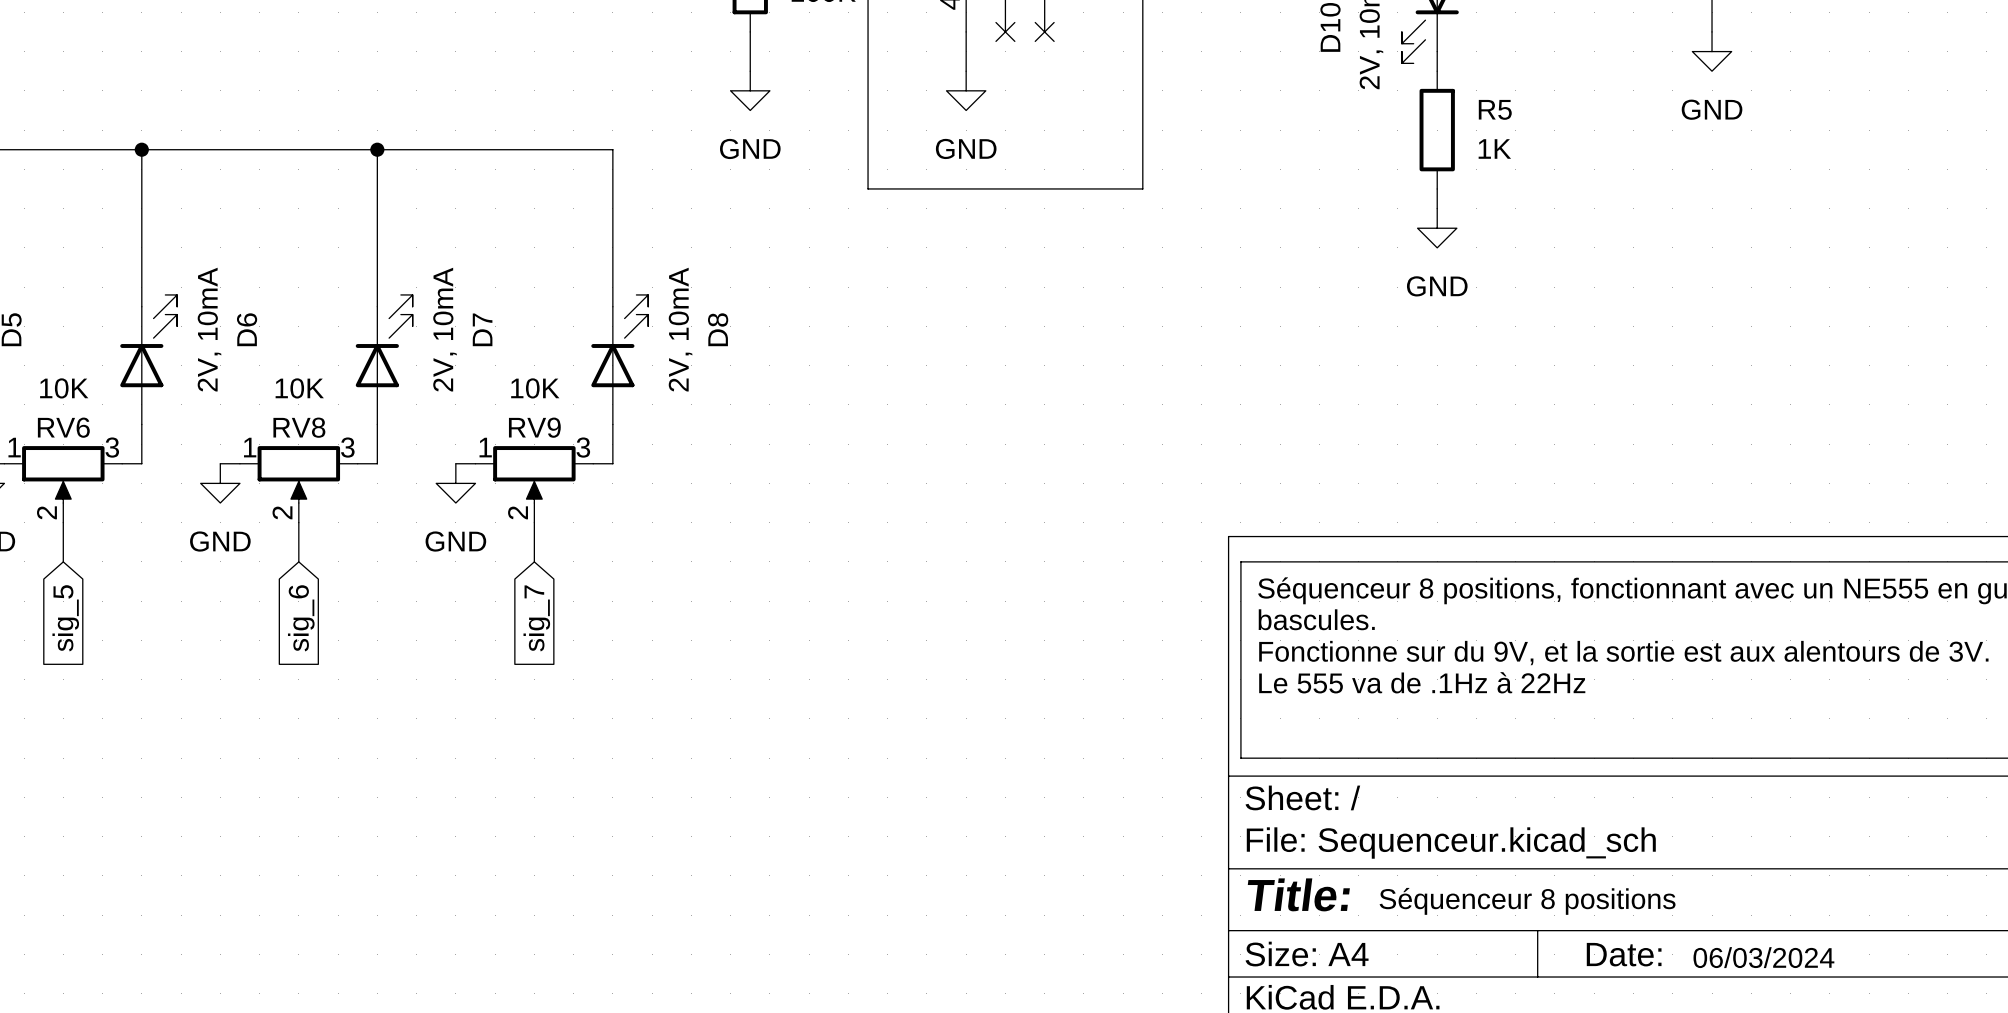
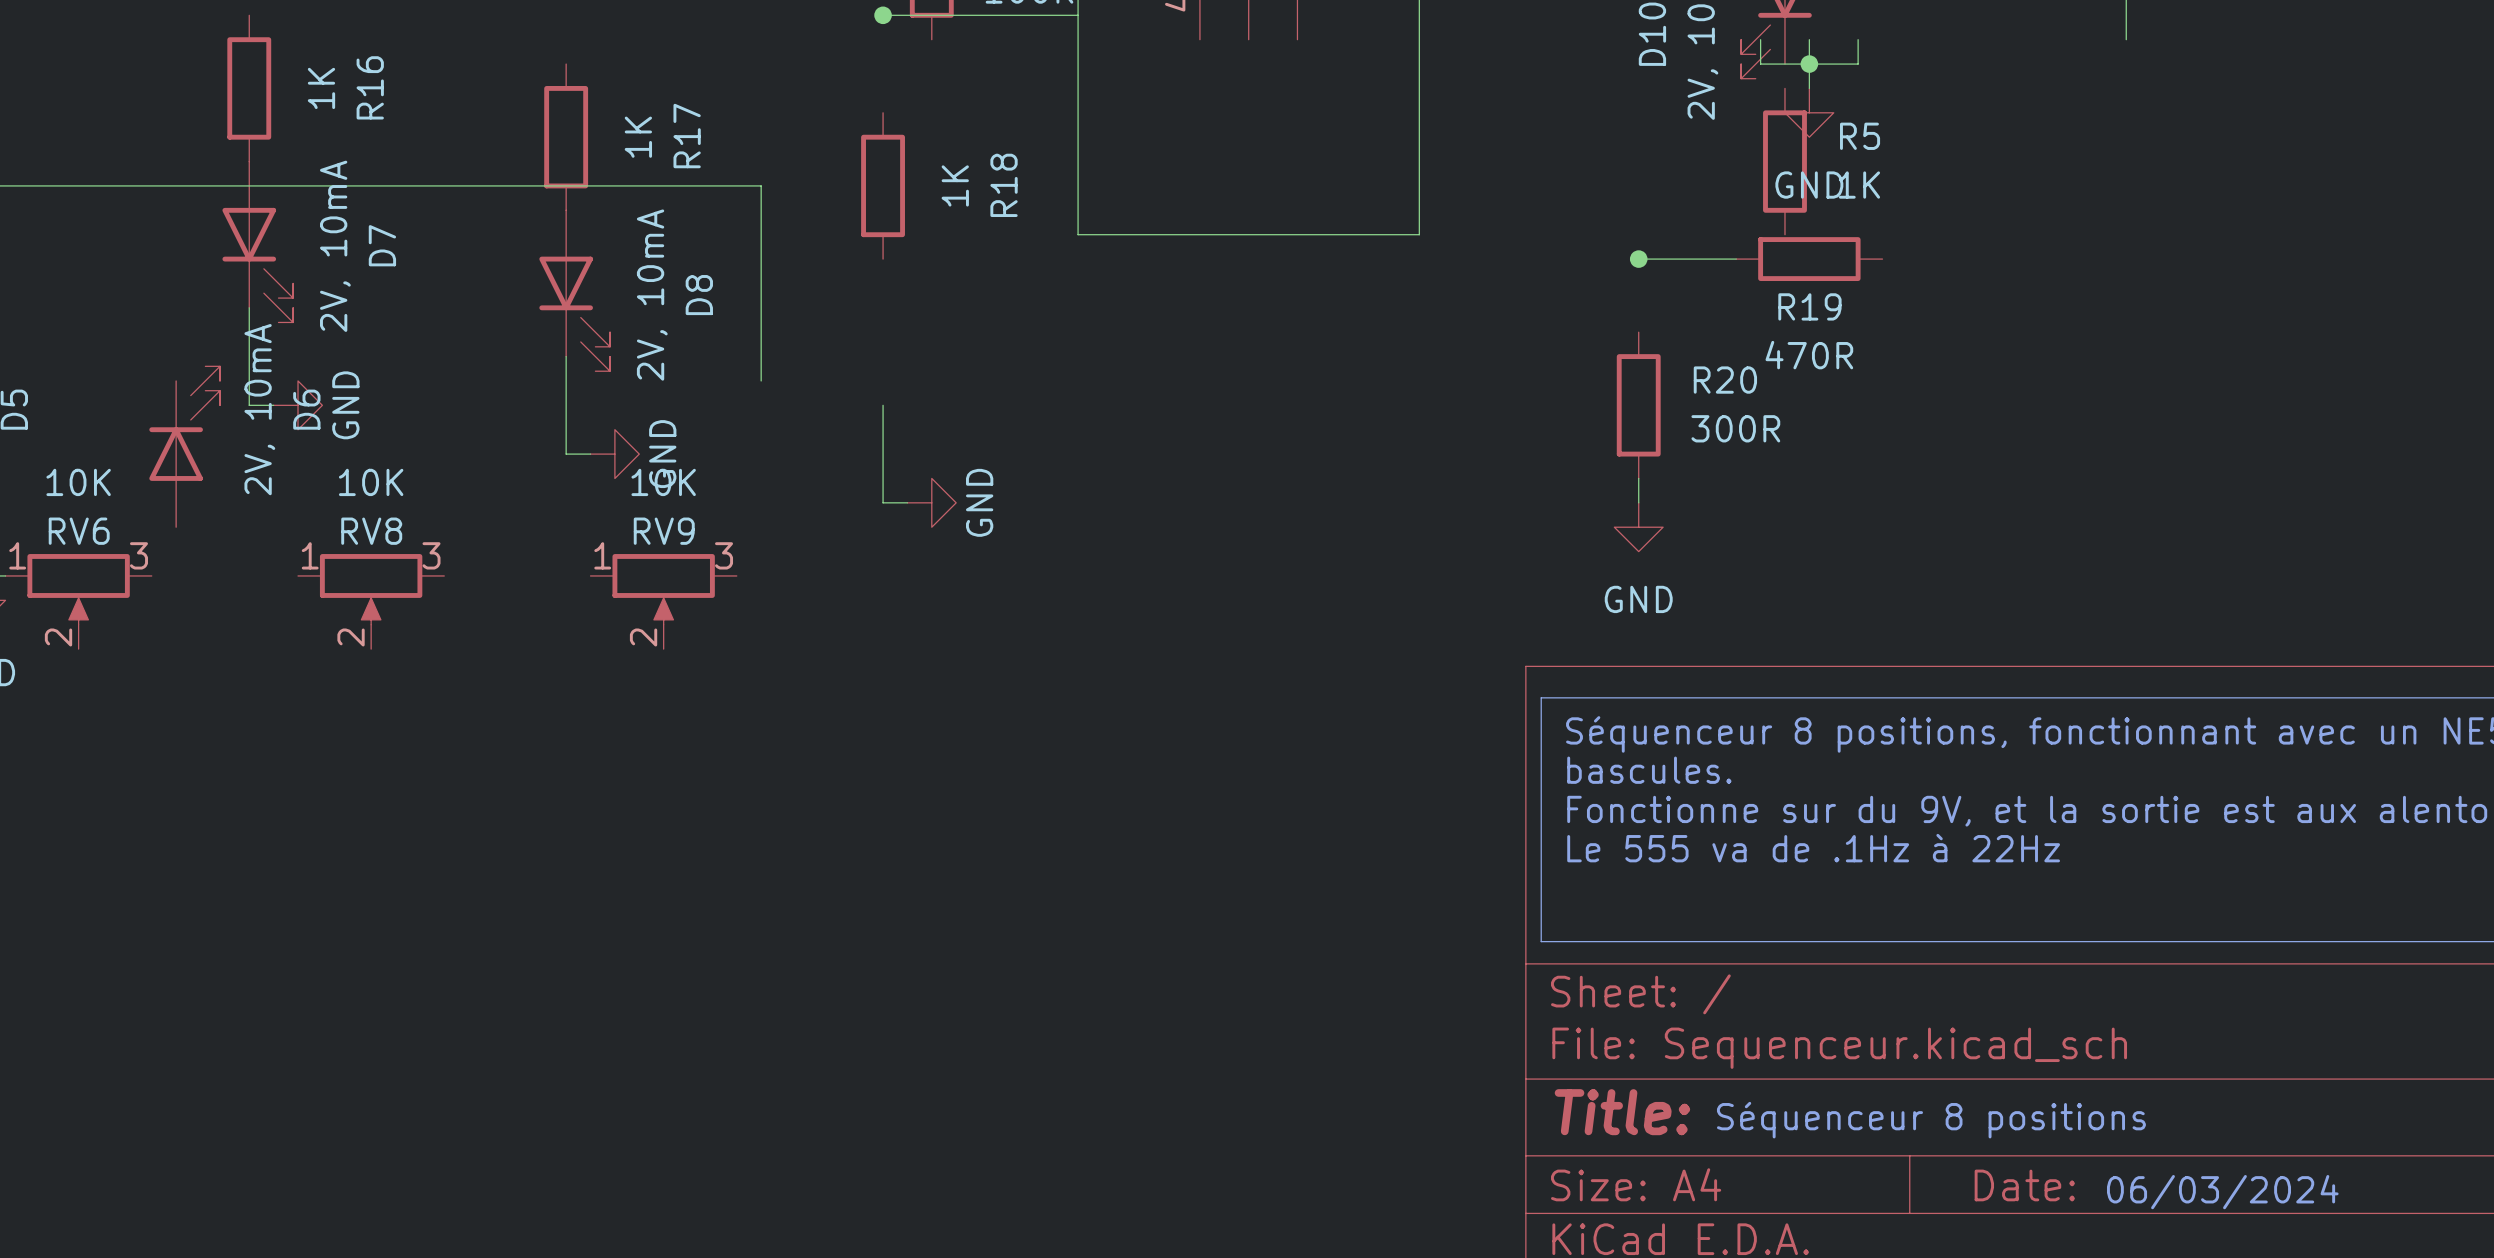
wire: none -> (883, 15) (1078, 15)
junction: none -> (883, 15)
wire: (750, 31) (750, 71) -> none
wire: (966, 31) (966, 71) -> none
no-connect mark: (1005, 31) -> none
no-connect mark: (1044, 31) -> none
wire: none -> (1760, 39) (1760, 64) (1858, 64) (1858, 39)
wire: none -> (1809, 39) (1809, 88)
wire: (1437, 51) (1437, 71) -> none
junction: none -> (1809, 64)
power symbol: GND (1712, 51) -> none
R16: none -> 1K (249, 88)
power symbol: GND (750, 90) -> none
power symbol: GND (966, 90) -> none
power symbol: none -> GND (1809, 112)
R17: none -> 1K (566, 137)
wire: (141, 149) (141, 306) -> none
junction: (141, 149) -> none
wire: (377, 149) (377, 306) -> none
junction: (377, 149) -> none
R18: none -> 1K (883, 185)
wire: (1437, 188) (1437, 208) -> (1638, 478) (1638, 502)
wire: none -> (1638, 259) (1736, 259)
junction: none -> (1638, 259)
R19: none -> 470R (1809, 259)
power symbol: GND (1437, 228) -> none
wire: none -> (249, 307) (249, 405) (273, 405)
wire: none -> (566, 356) (566, 454) (590, 454)
power symbol: none -> GND (298, 405)
wire: none -> (883, 405) (883, 502) (907, 502)
R20: none -> 300R (1638, 405)
D7 flip: as is (384, 341) -> up-down (257, 265)
D8 flip: as is (619, 341) -> up-down (574, 313)
D7 position: (384, 359) -> (257, 242)
D8 position: (619, 359) -> (574, 290)
power symbol: none -> GND (931, 502)
wire: (141, 424) (141, 463) (122, 463) -> none
wire: (377, 424) (377, 463) (357, 463) -> none
wire: (612, 424) (612, 463) (593, 463) -> none
power symbol: none -> GND (1638, 527)
wire: (220, 463) (239, 463) -> none
wire: (455, 463) (475, 463) -> none
power symbol: GND (220, 483) -> none
power symbol rotation: 0° (455, 483) -> 90° counterclockwise (614, 454)
power symbol position: GND (455, 483) -> GND (614, 454)
wire: (63, 522) (63, 561) -> none
wire: (298, 522) (298, 561) -> none
wire: (534, 522) (534, 561) -> none
global label: sig_5 (65, 618) -> none
global label: sig_6 (301, 618) -> none
global label: sig_7 (536, 618) -> none

